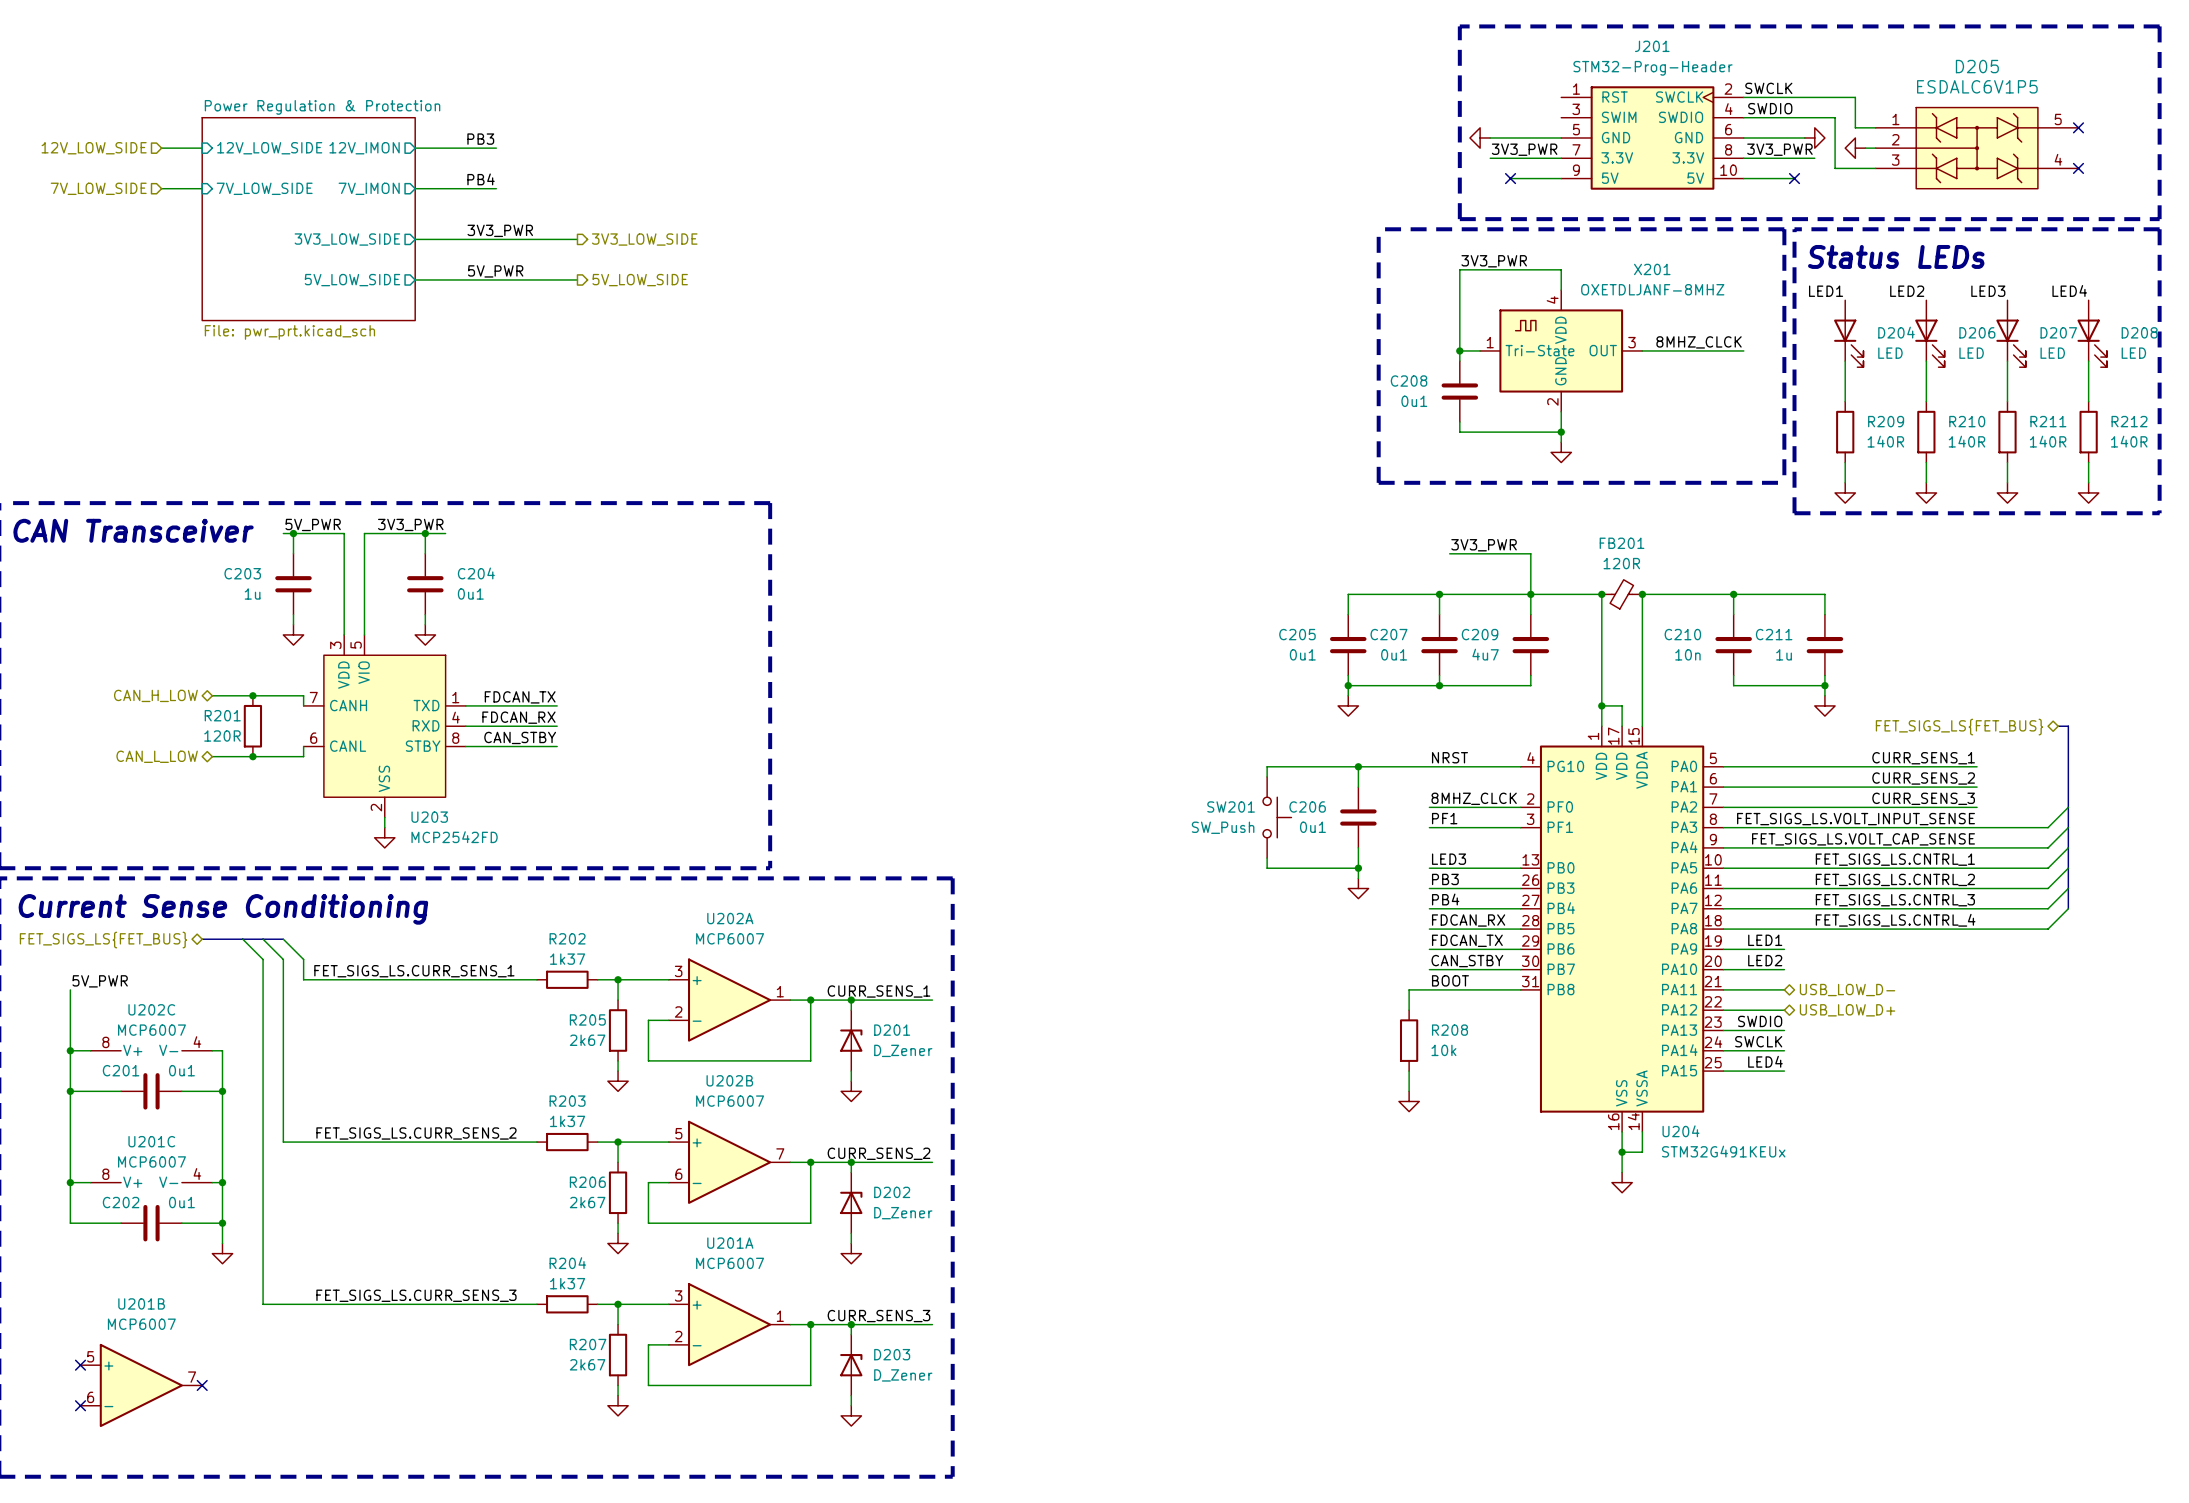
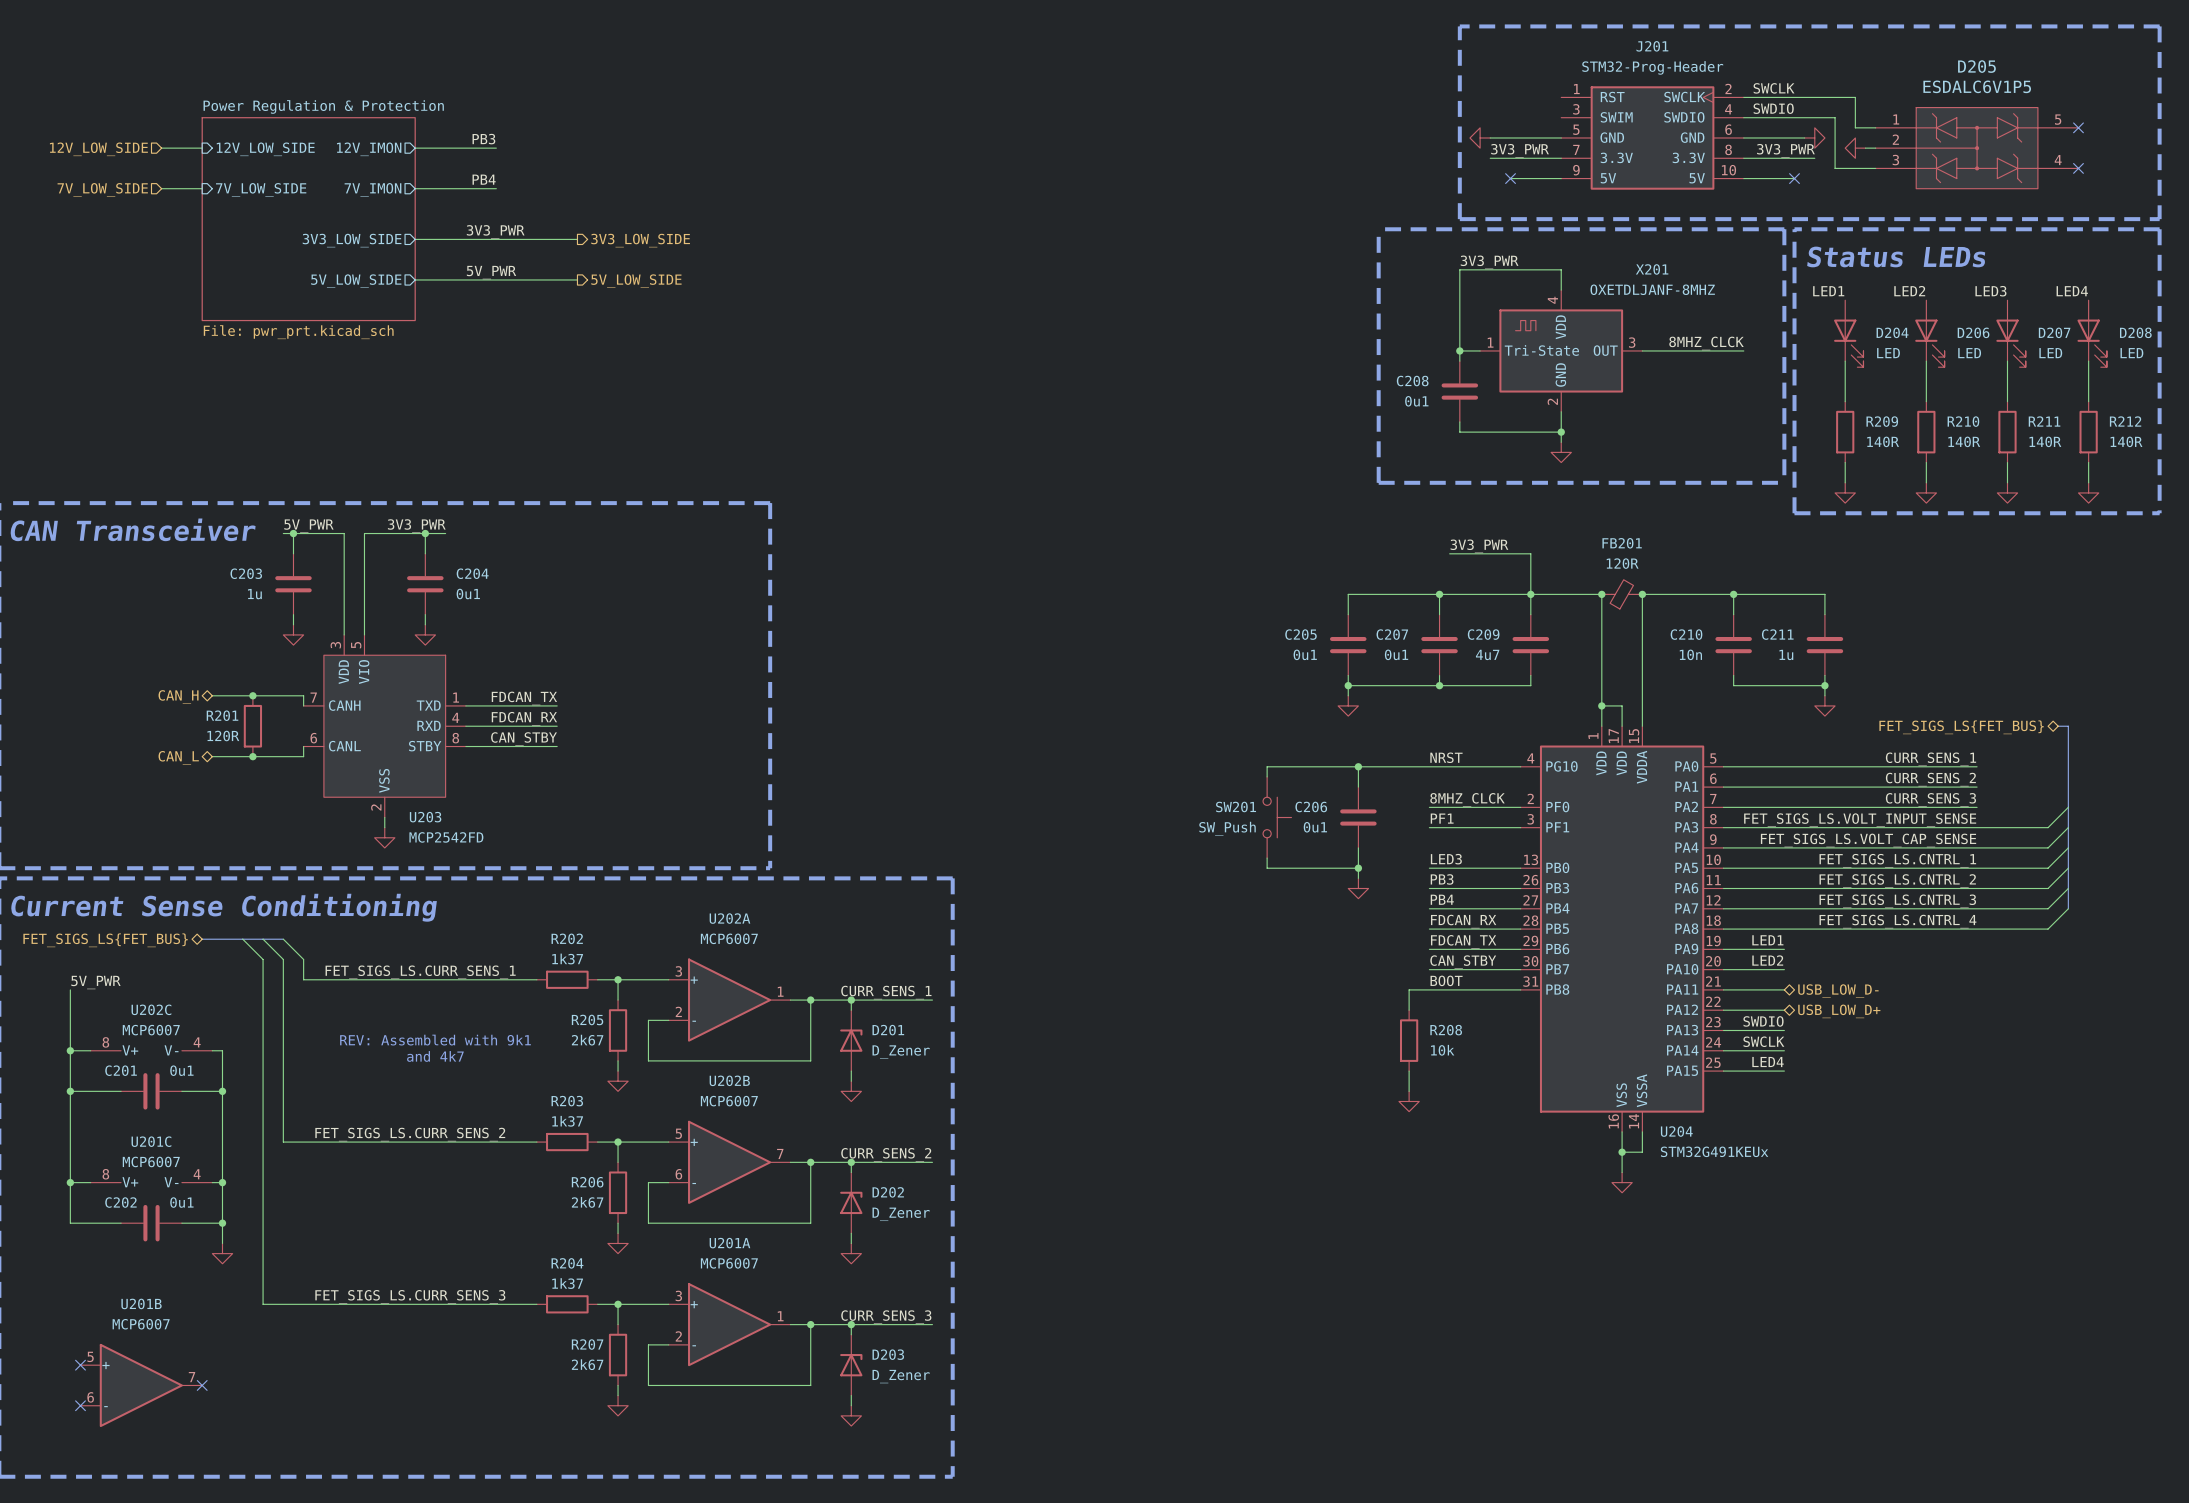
hierarchical label: CAN_H_LOW (155, 695) -> CAN_H (178, 696)
hierarchical label: CAN_L_LOW (157, 756) -> CAN_L (178, 757)
text: none -> REV: Assembled with 9k1 (435, 1040)
text: none -> and 4k7 (435, 1056)

